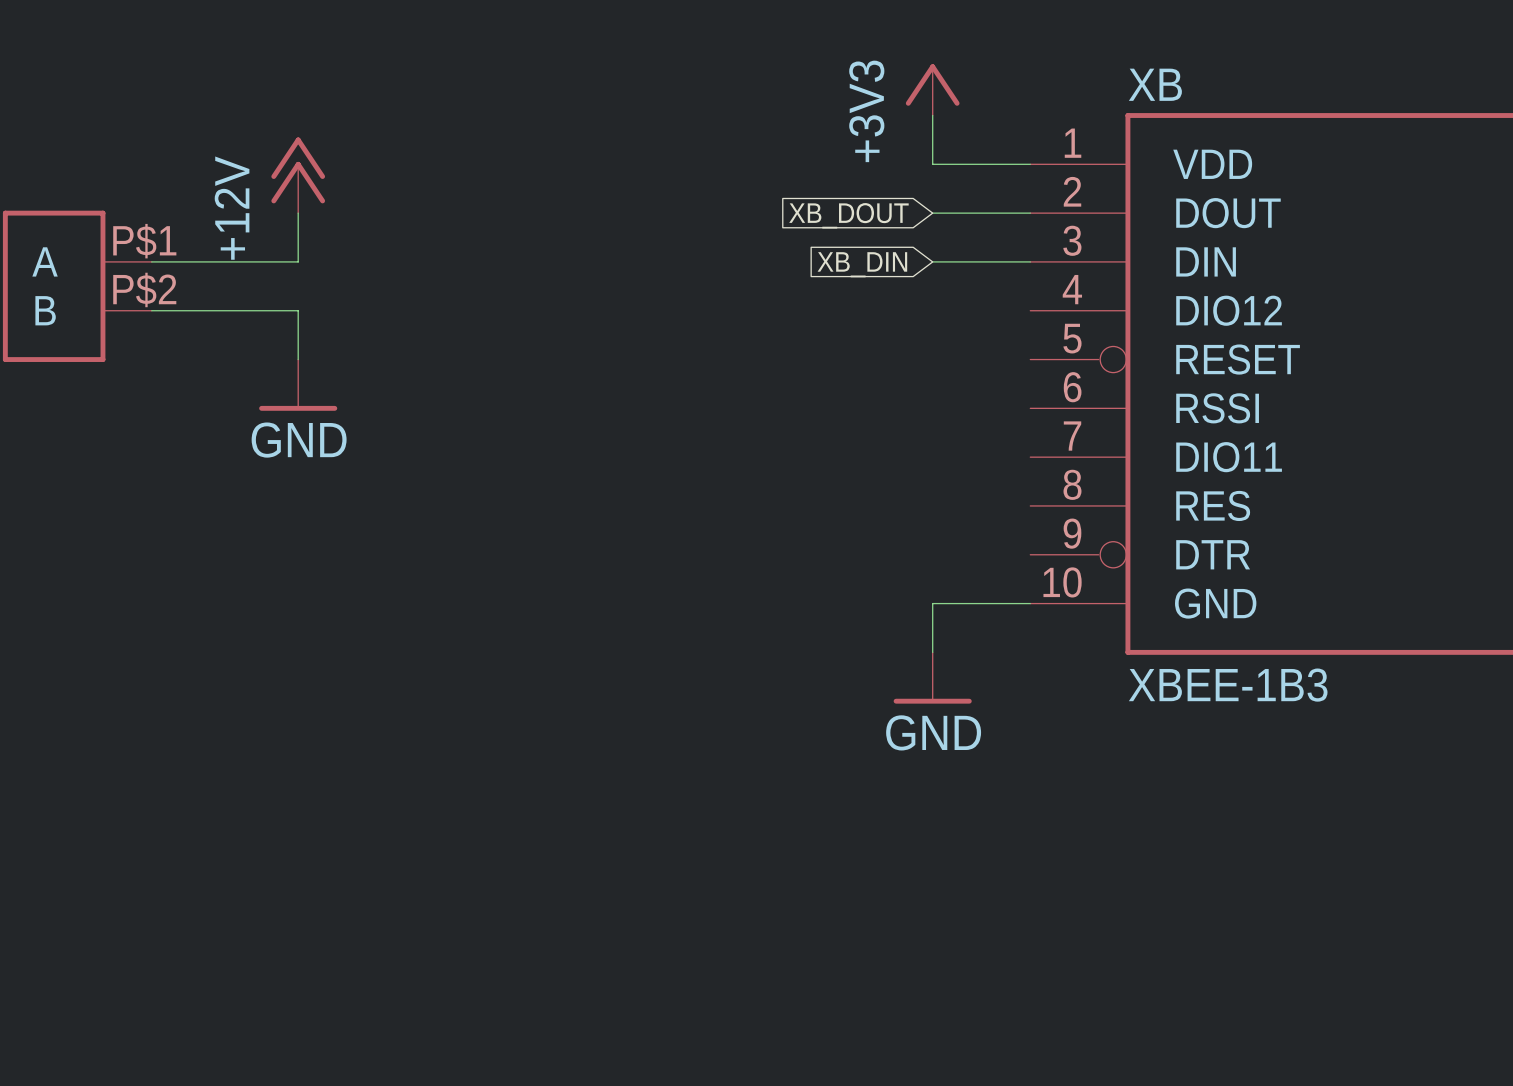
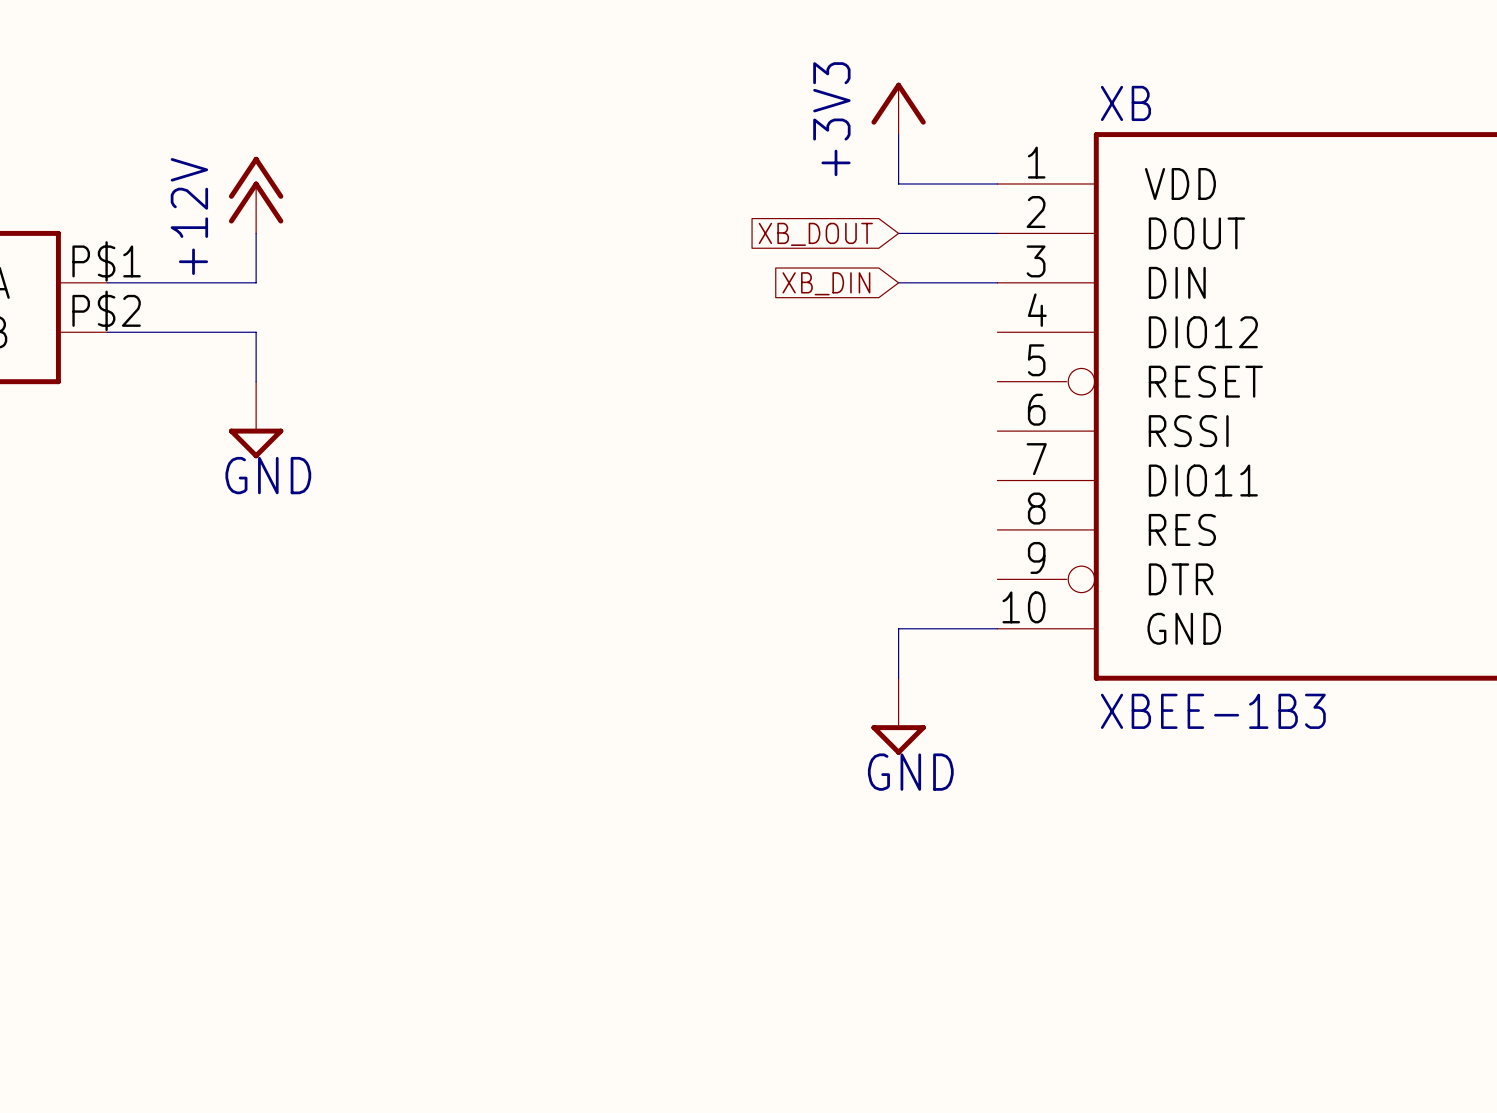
power symbol shape: [259, 359, 338, 411] -> [228, 381, 284, 459]
power symbol shape: [893, 652, 972, 704] -> [871, 678, 926, 755]

